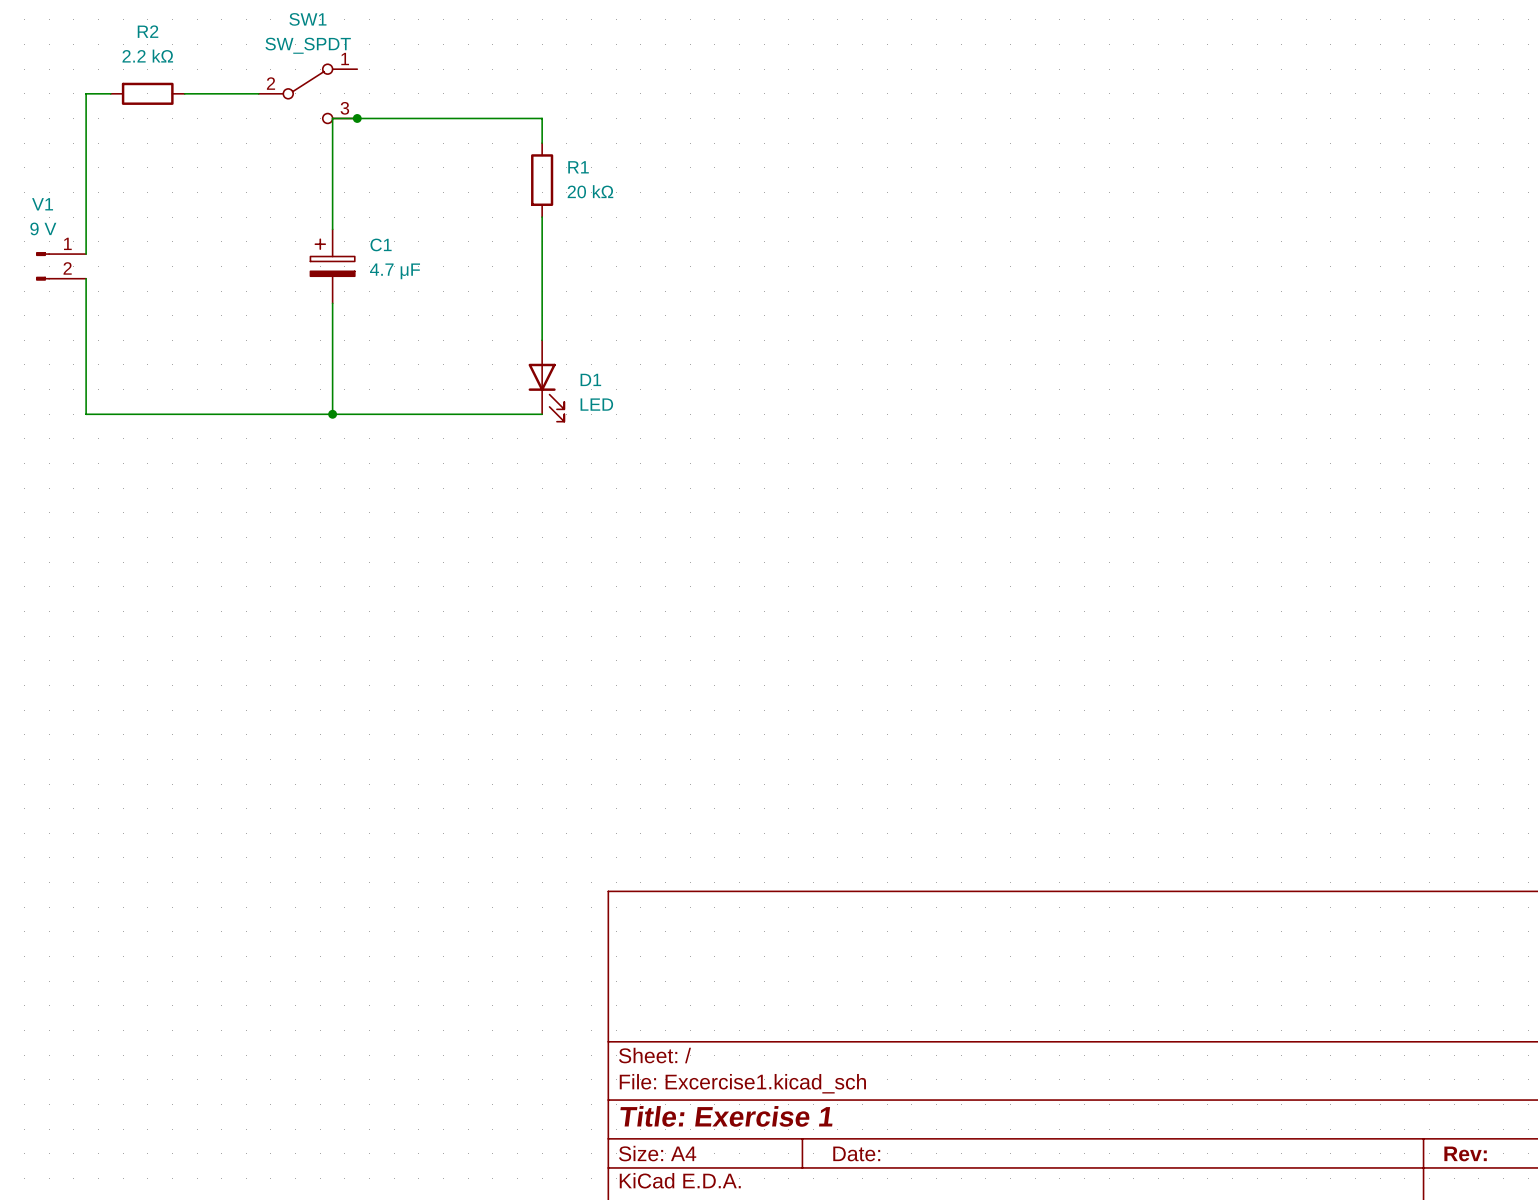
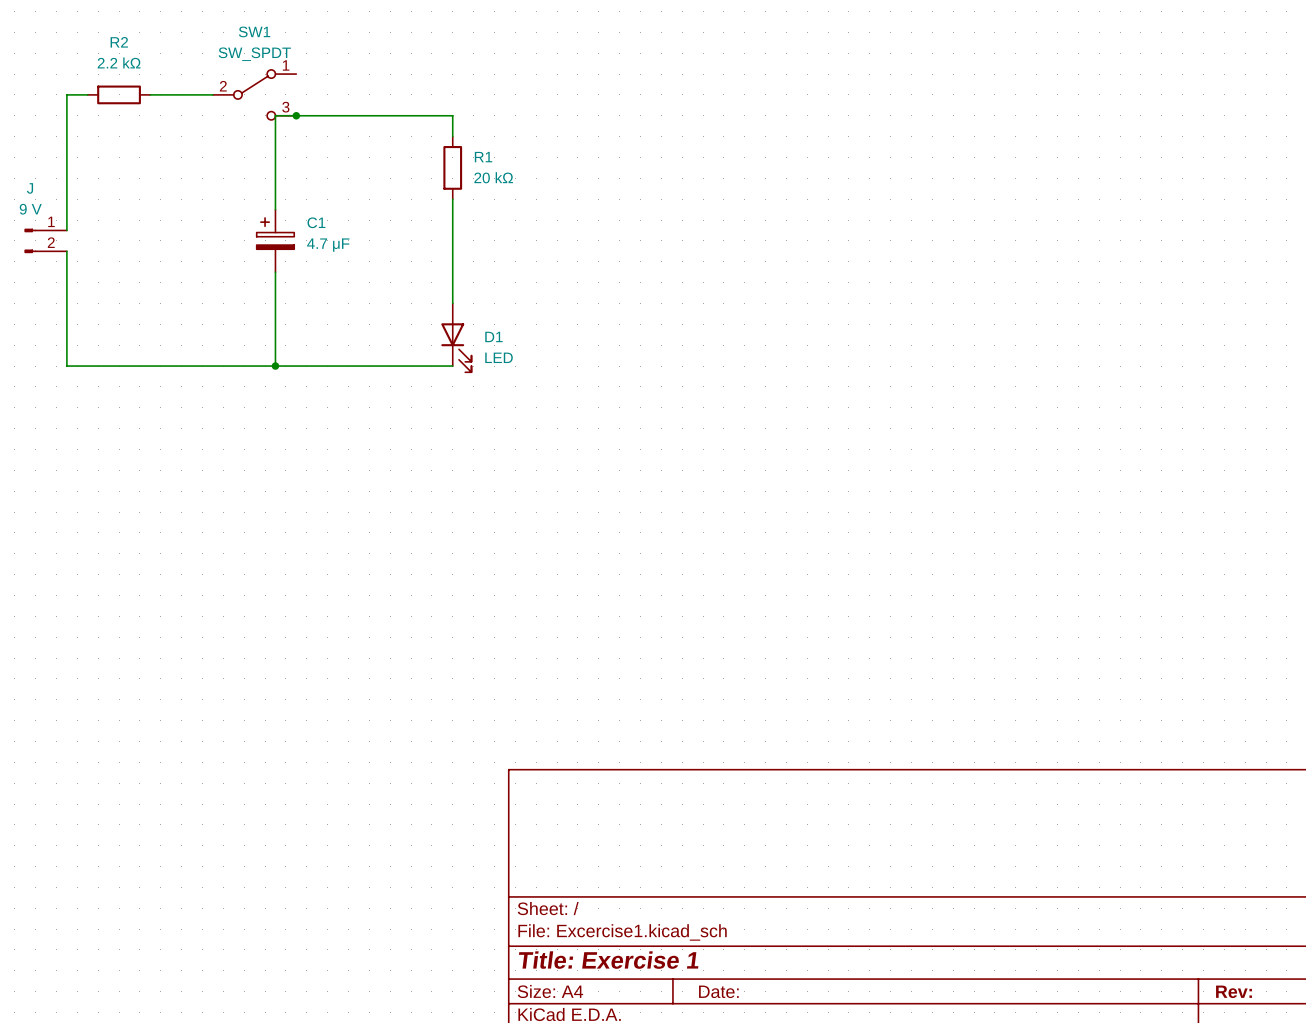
V1 name: V1 (42, 204) -> J (29, 188)

